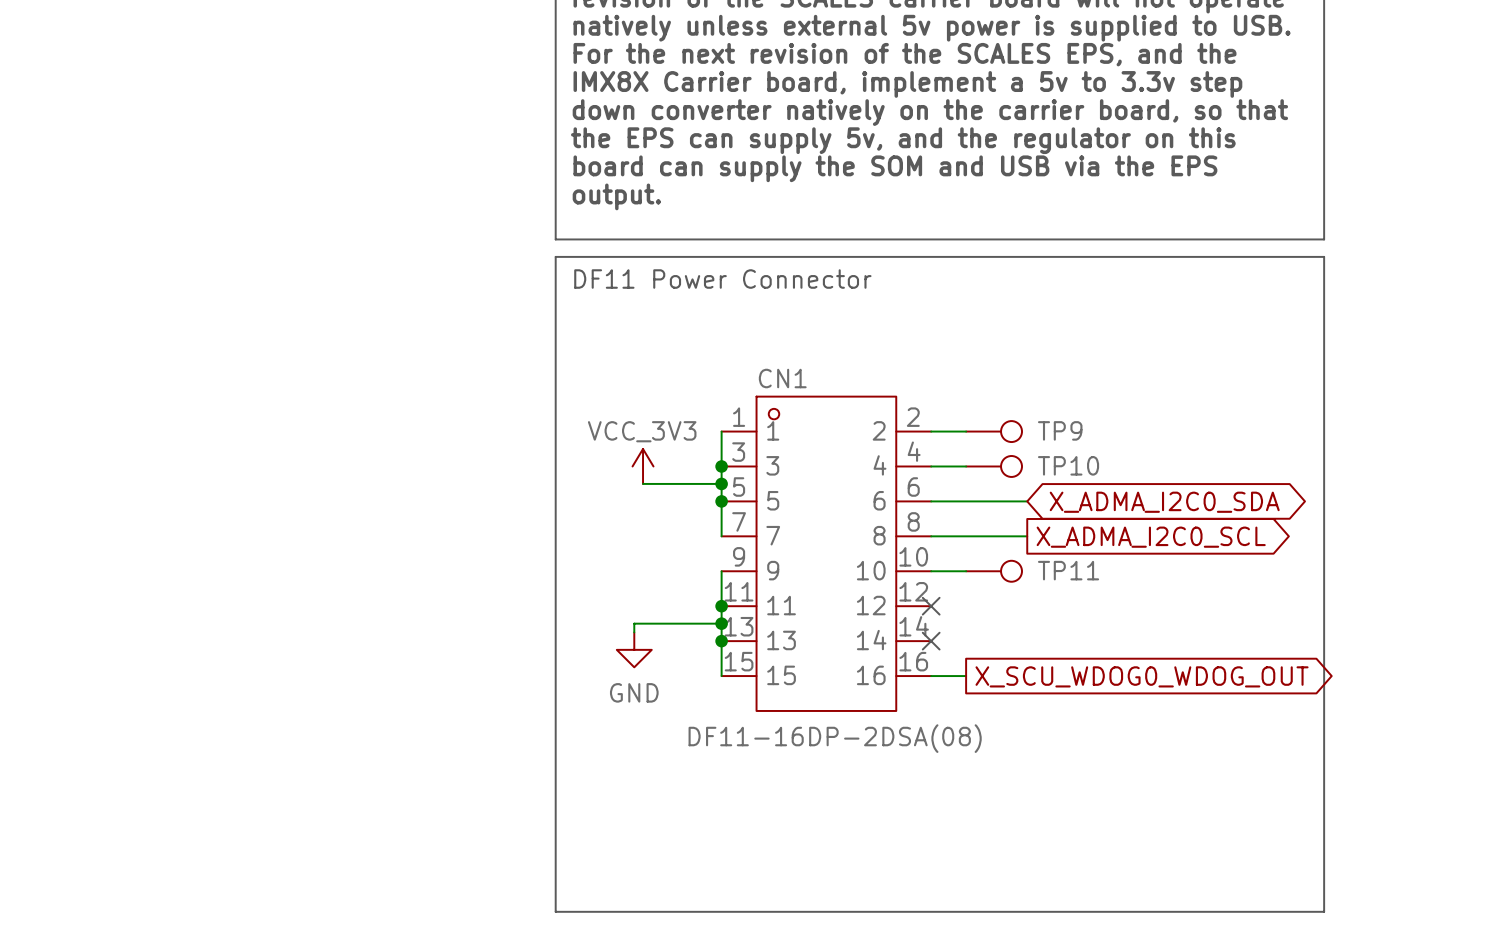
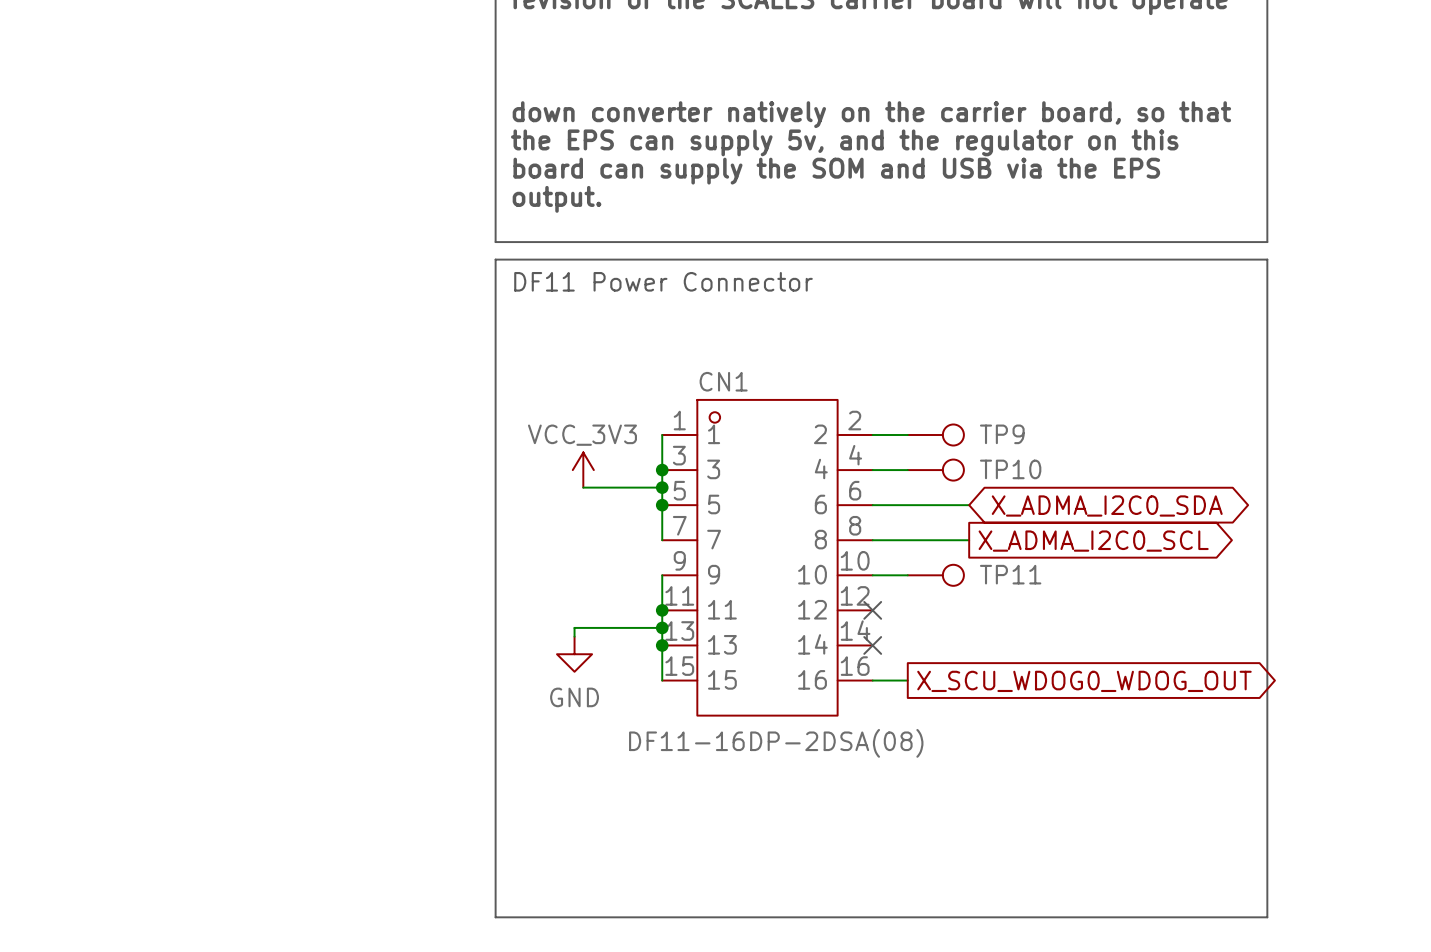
text: natively unless external 5v power is supplied to USB. (932, 28) -> none
text: For the next revision of the SCALES EPS, and the (905, 54) -> none
text: IMX8X Carrier board, implement a 5v to 3.3v step (907, 84) -> none

